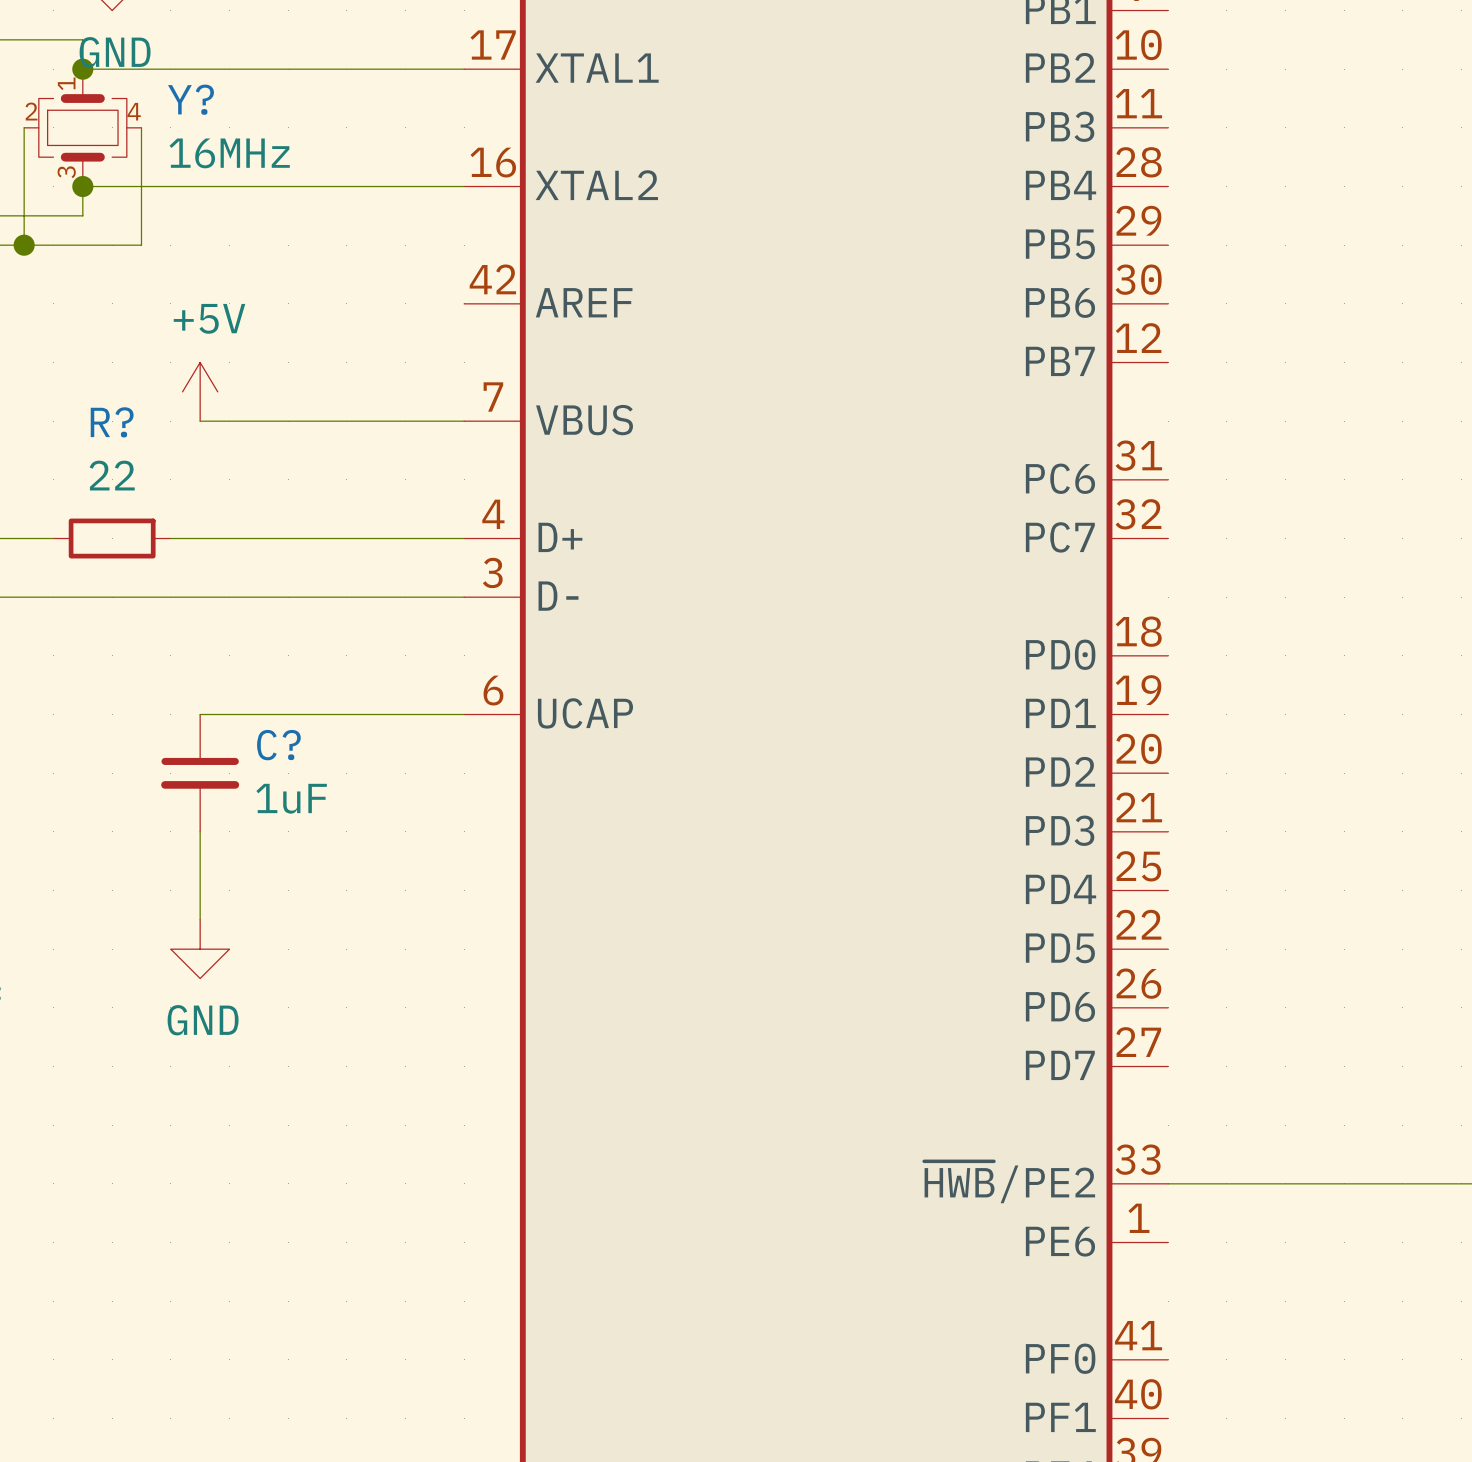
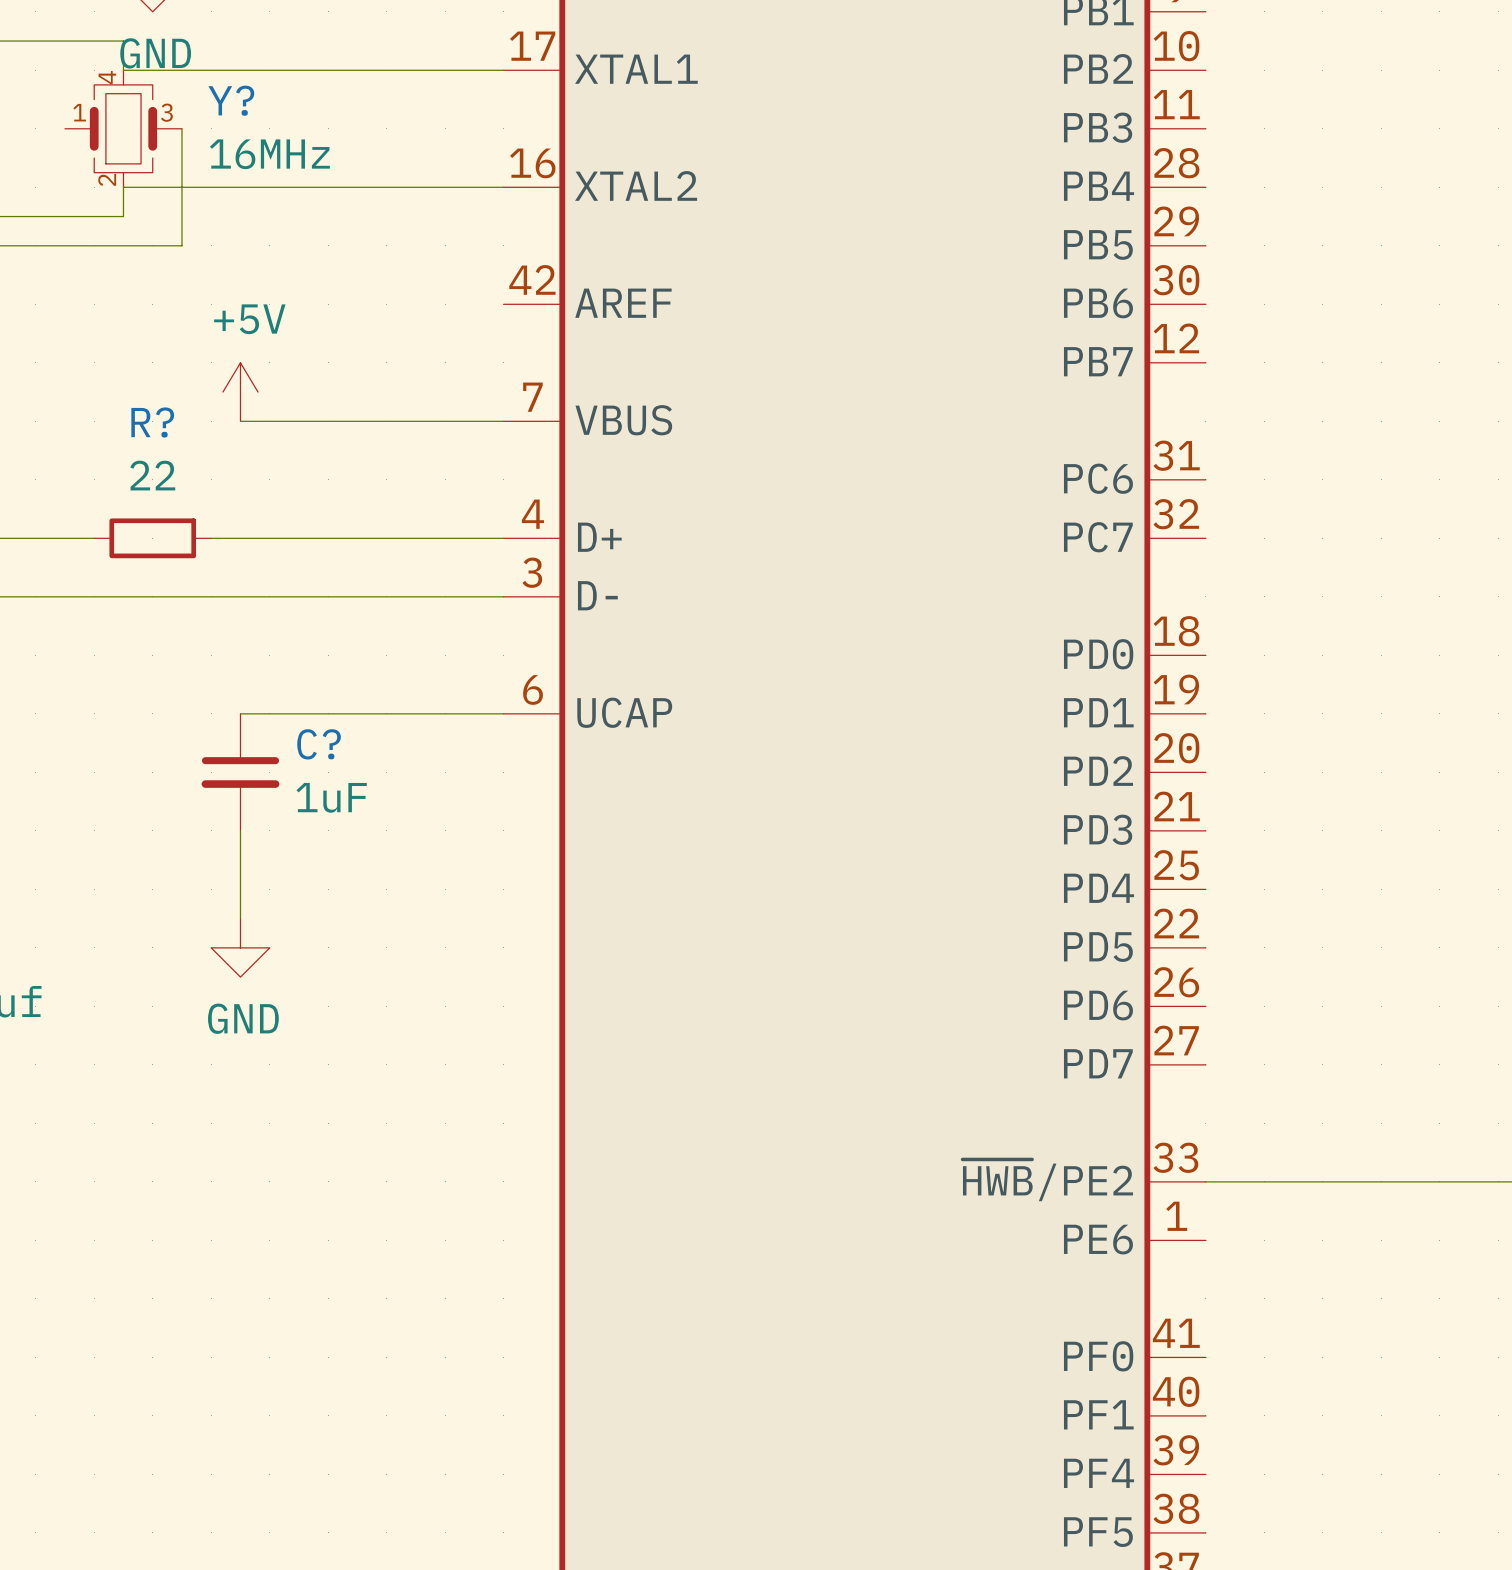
junction: (82, 69) -> none
wire: (24, 127) (24, 245) -> none
Y? rotation: 0° (82, 127) -> 90° counterclockwise (123, 128)
junction: (82, 186) -> none
junction: (24, 245) -> none

